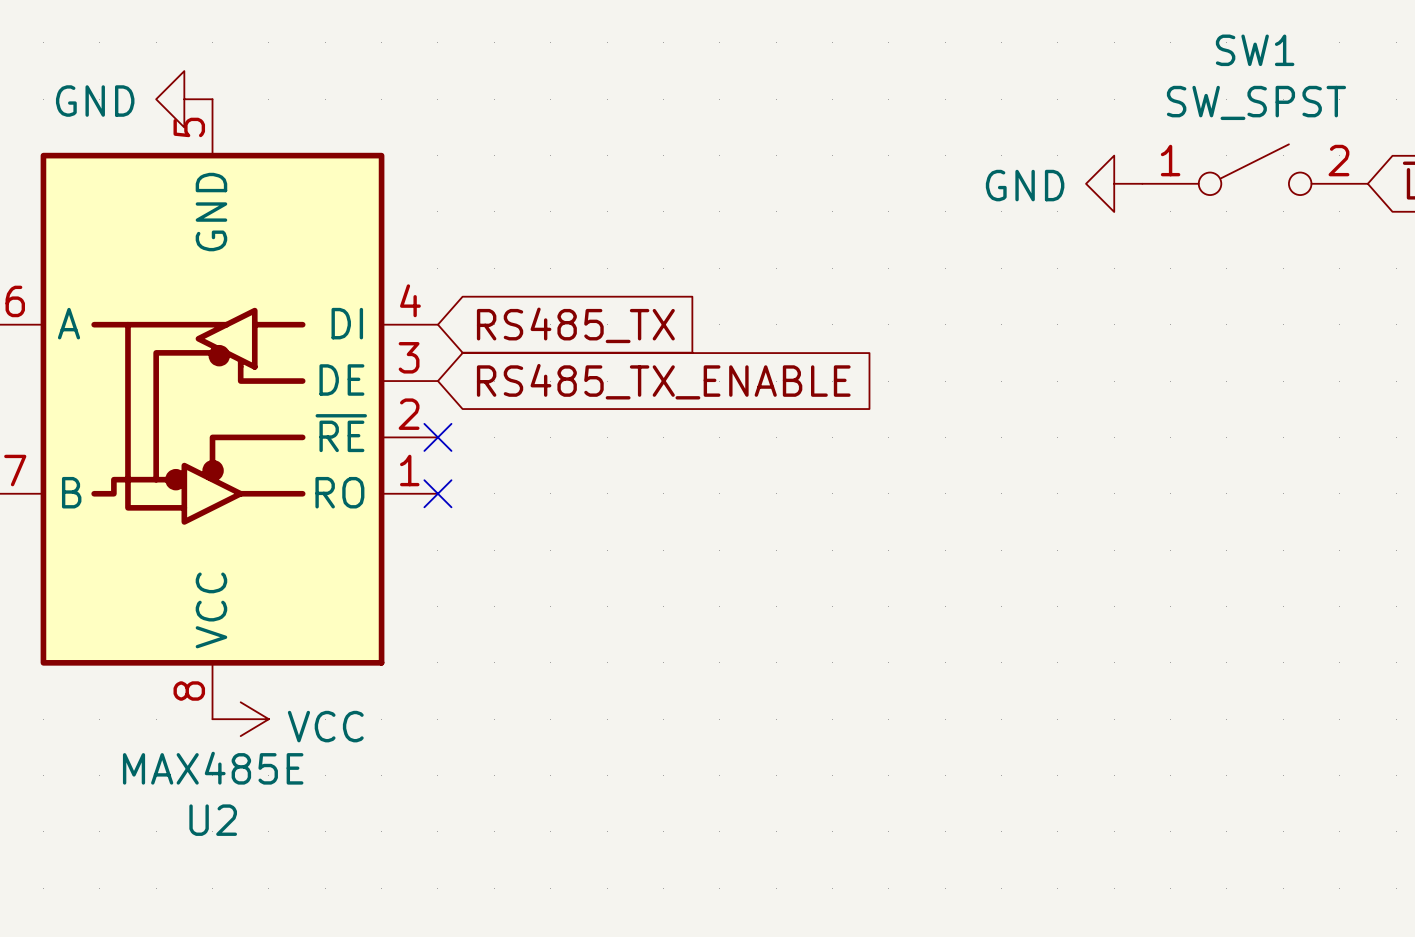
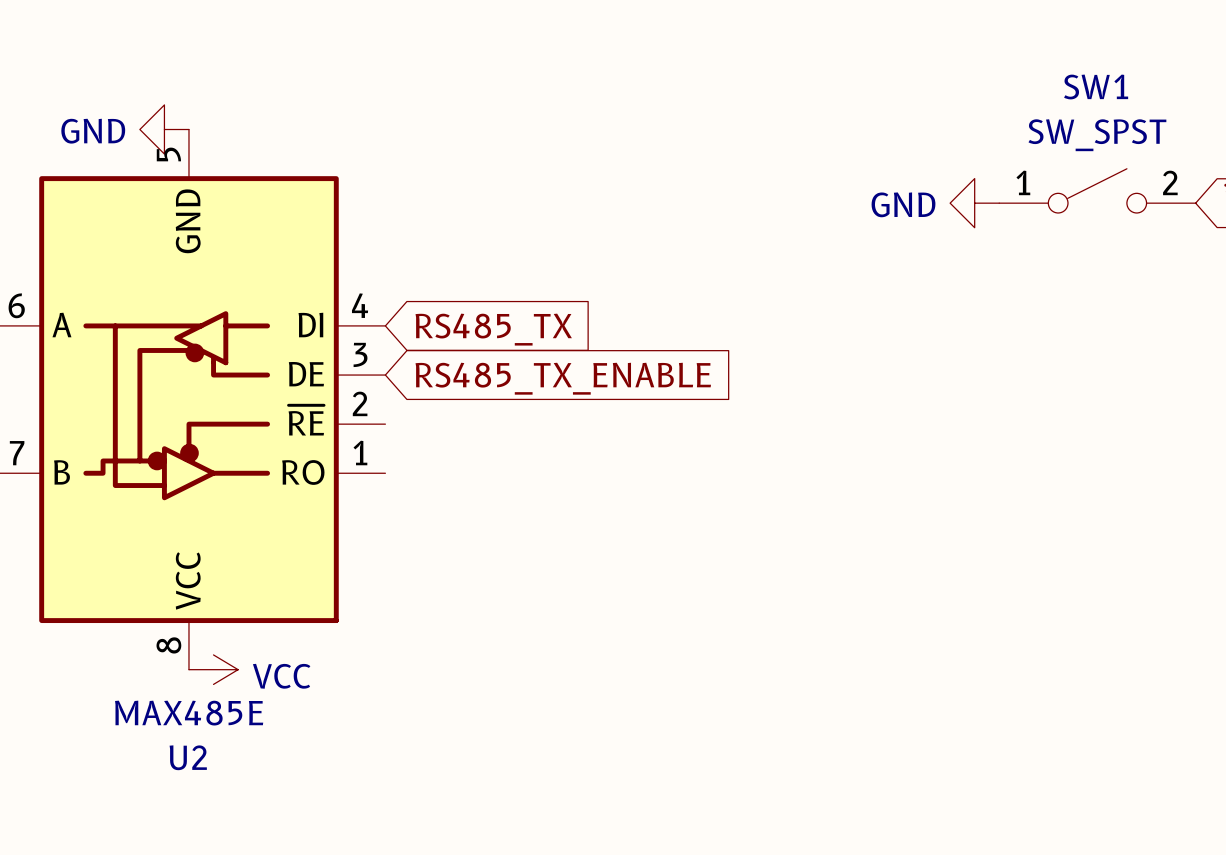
no-connect mark: (437, 437) -> none
no-connect mark: (437, 493) -> none

